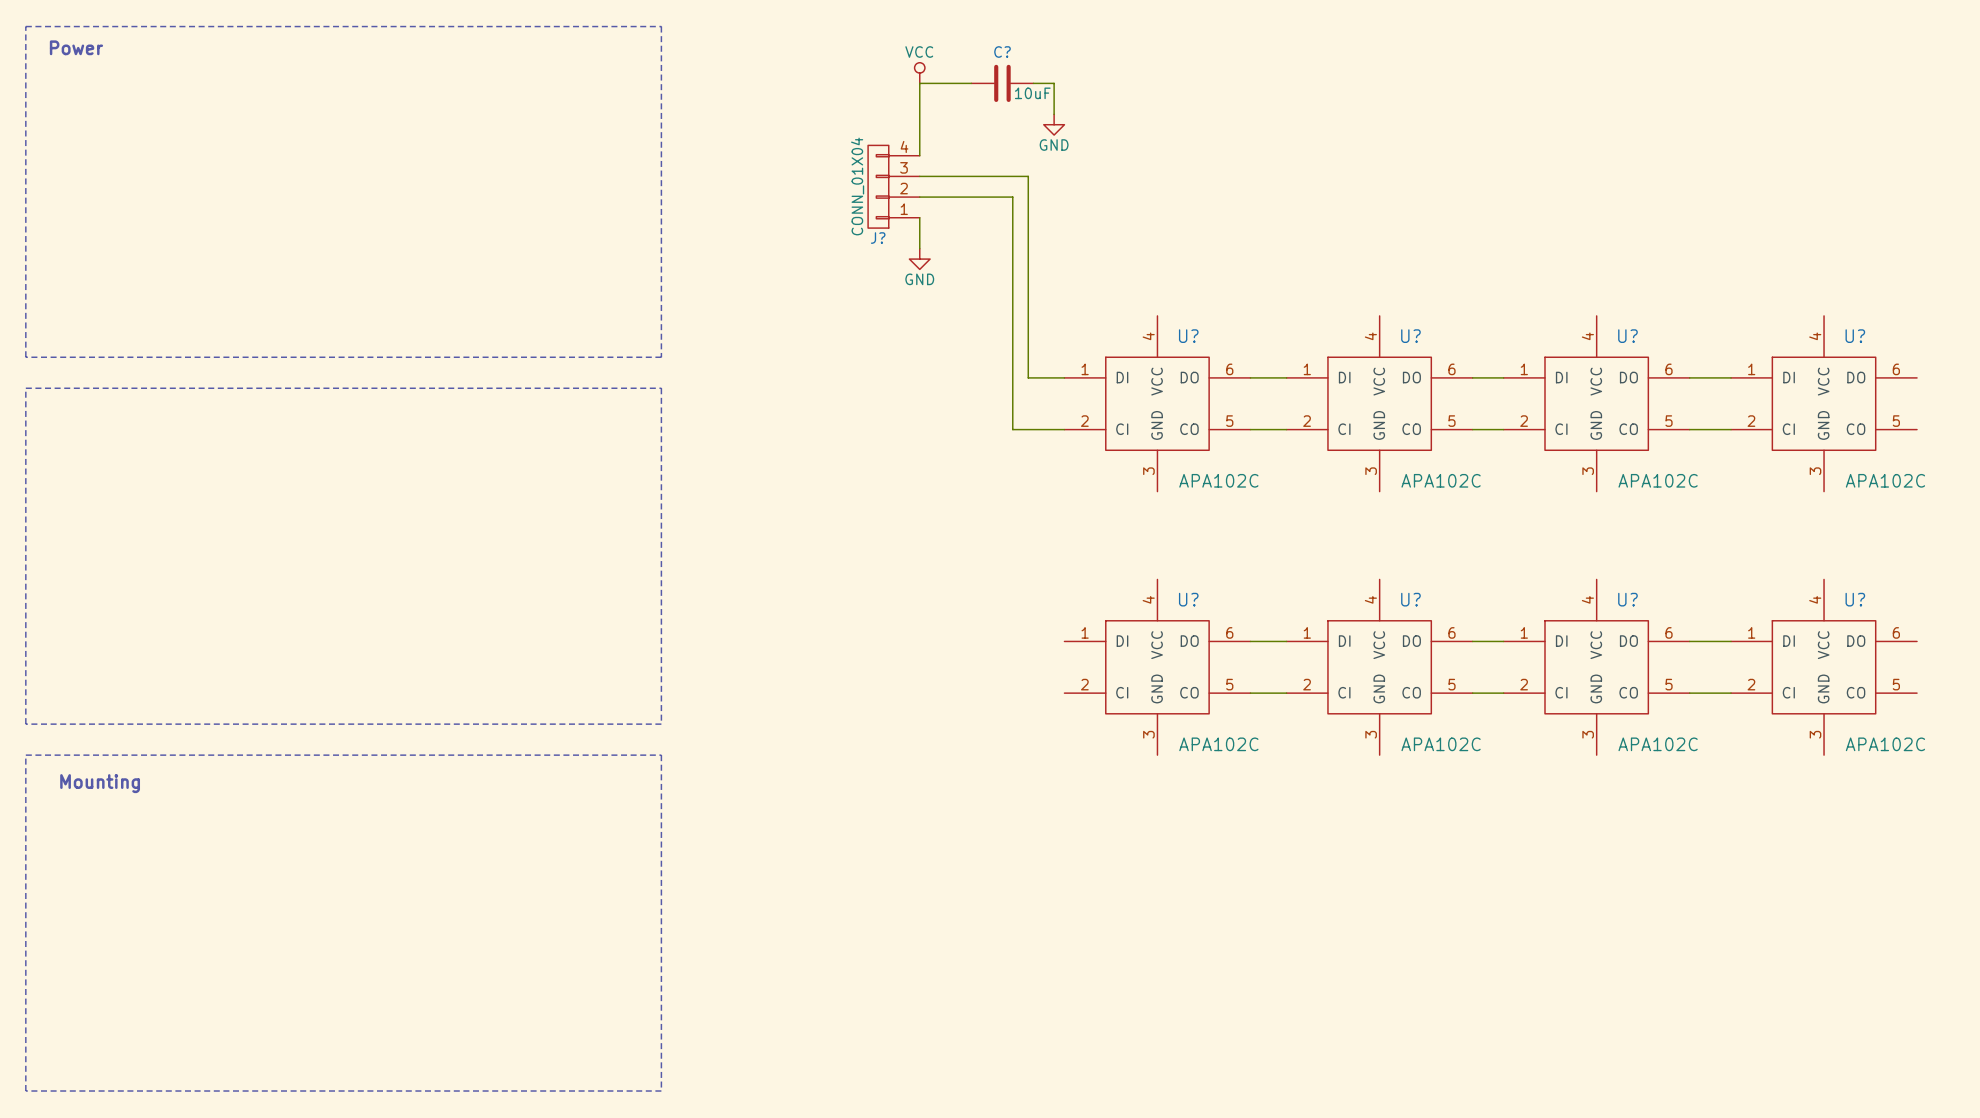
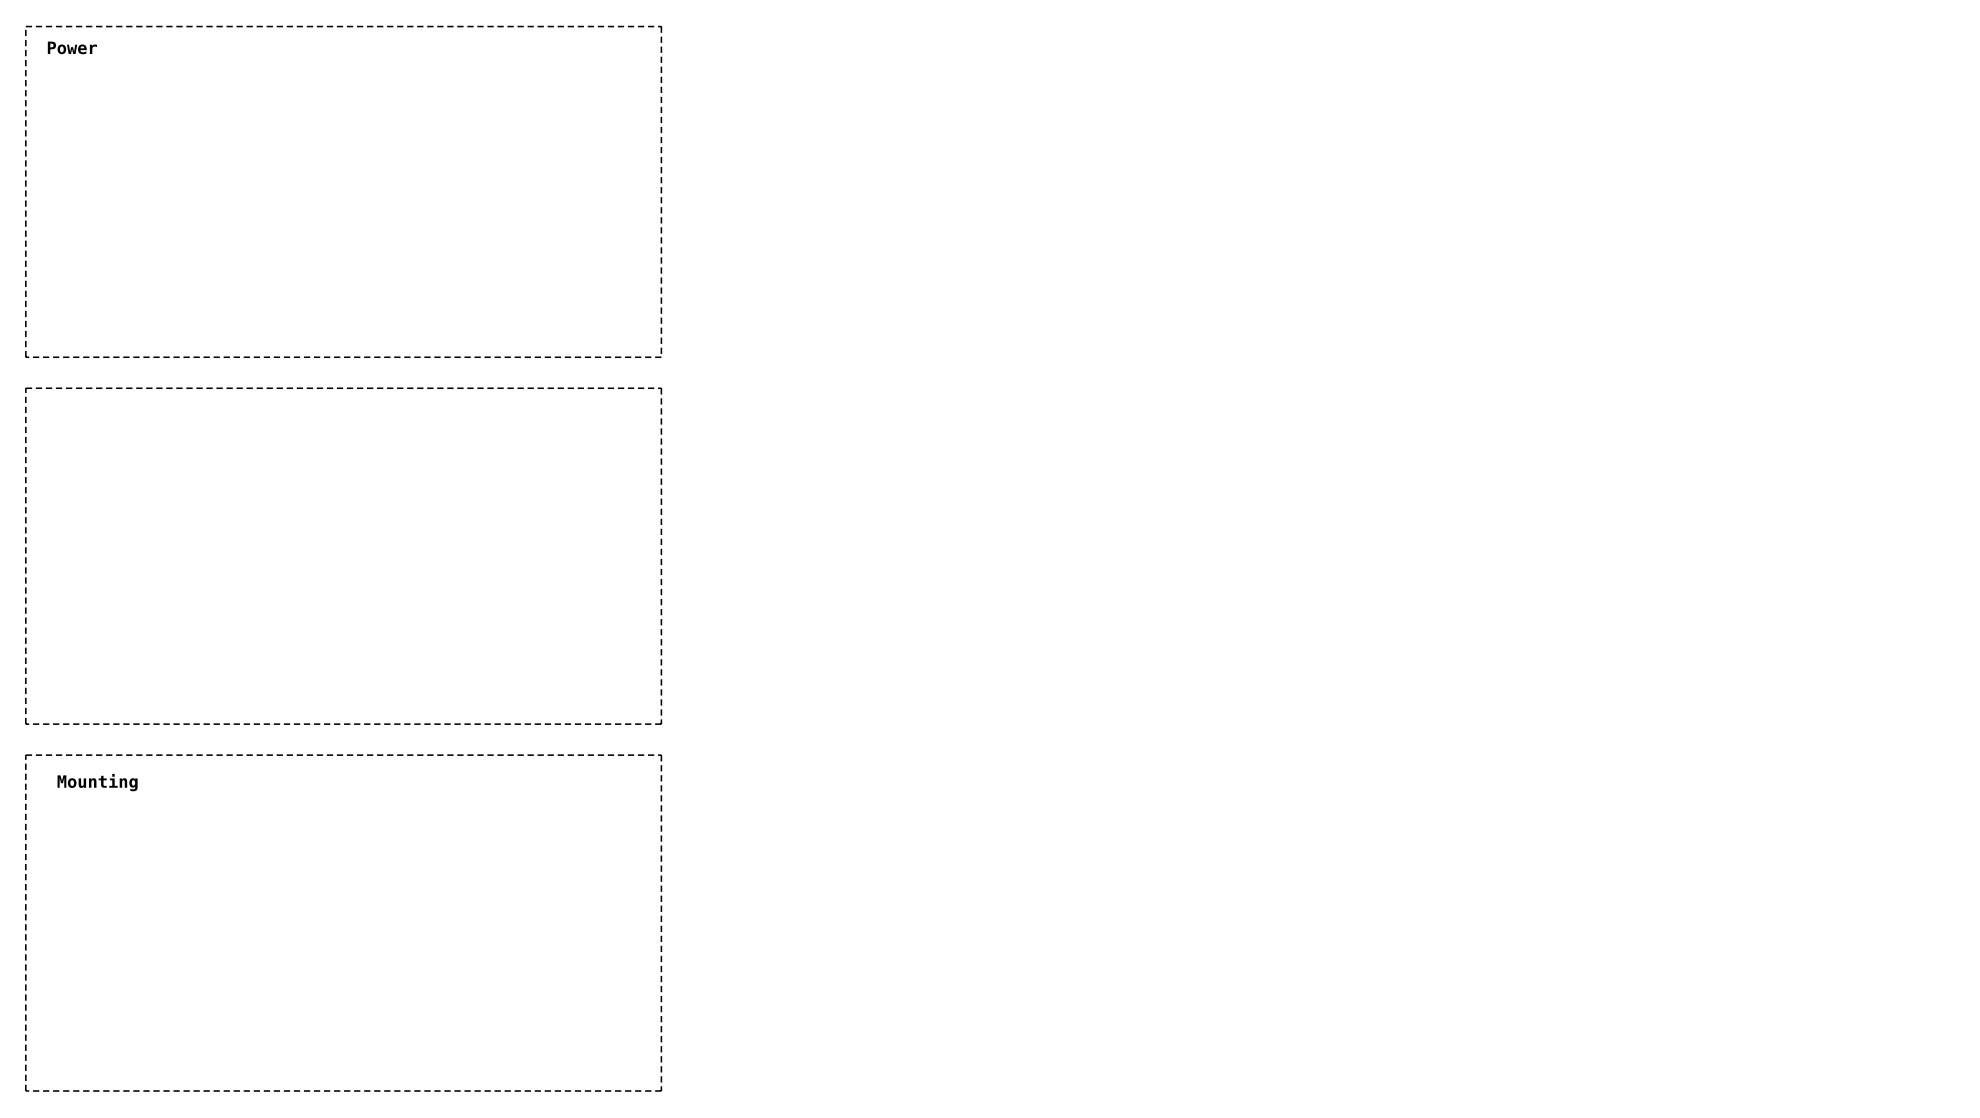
power symbol: VCC (919, 73) -> none
wire: (971, 83) (919, 83) (919, 155) -> none
C?: 10uF (1002, 83) -> none
wire: (1033, 83) (1054, 83) (1054, 114) -> none
power symbol: GND (1054, 124) -> none
wire: (919, 176) (1028, 176) (1028, 377) (1064, 377) -> none
J?: CONN_01X04 (893, 186) -> none
wire: (919, 197) (1012, 197) (1012, 429) (1064, 429) -> none
wire: (919, 217) (919, 248) -> none
power symbol: GND (919, 259) -> none
wire: (1250, 377) (1286, 377) -> none
wire: (1472, 377) (1503, 377) -> none
wire: (1689, 377) (1731, 377) -> none
U?: APA102C (1157, 403) -> none
U?: APA102C (1379, 403) -> none
U?: APA102C (1596, 403) -> none
U?: APA102C (1824, 403) -> none
wire: (1250, 429) (1286, 429) -> none
wire: (1472, 429) (1503, 429) -> none
wire: (1689, 429) (1731, 429) -> none
wire: (1250, 641) (1286, 641) -> none
wire: (1472, 641) (1503, 641) -> none
wire: (1689, 641) (1731, 641) -> none
U?: APA102C (1157, 667) -> none
U?: APA102C (1379, 667) -> none
U?: APA102C (1596, 667) -> none
U?: APA102C (1824, 667) -> none
wire: (1250, 693) (1286, 693) -> none
wire: (1472, 693) (1503, 693) -> none
wire: (1689, 693) (1731, 693) -> none

